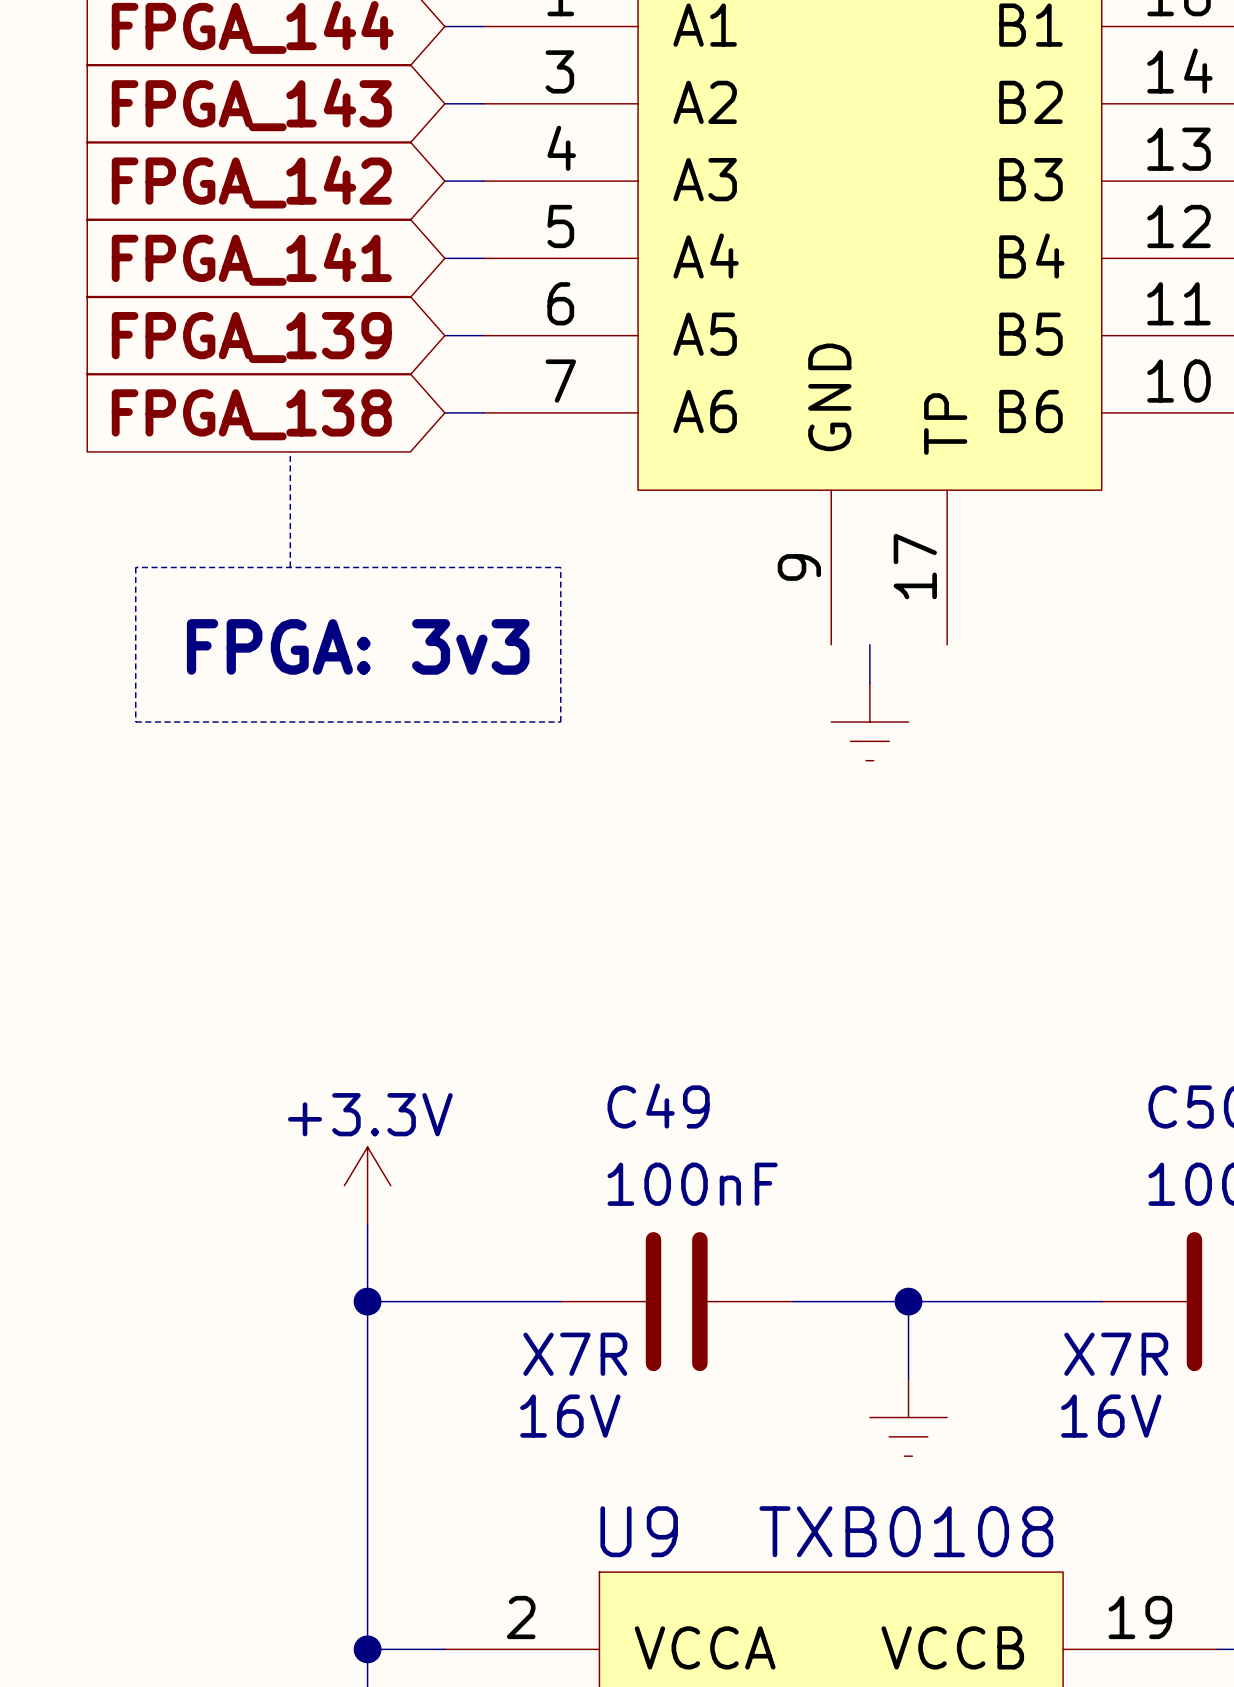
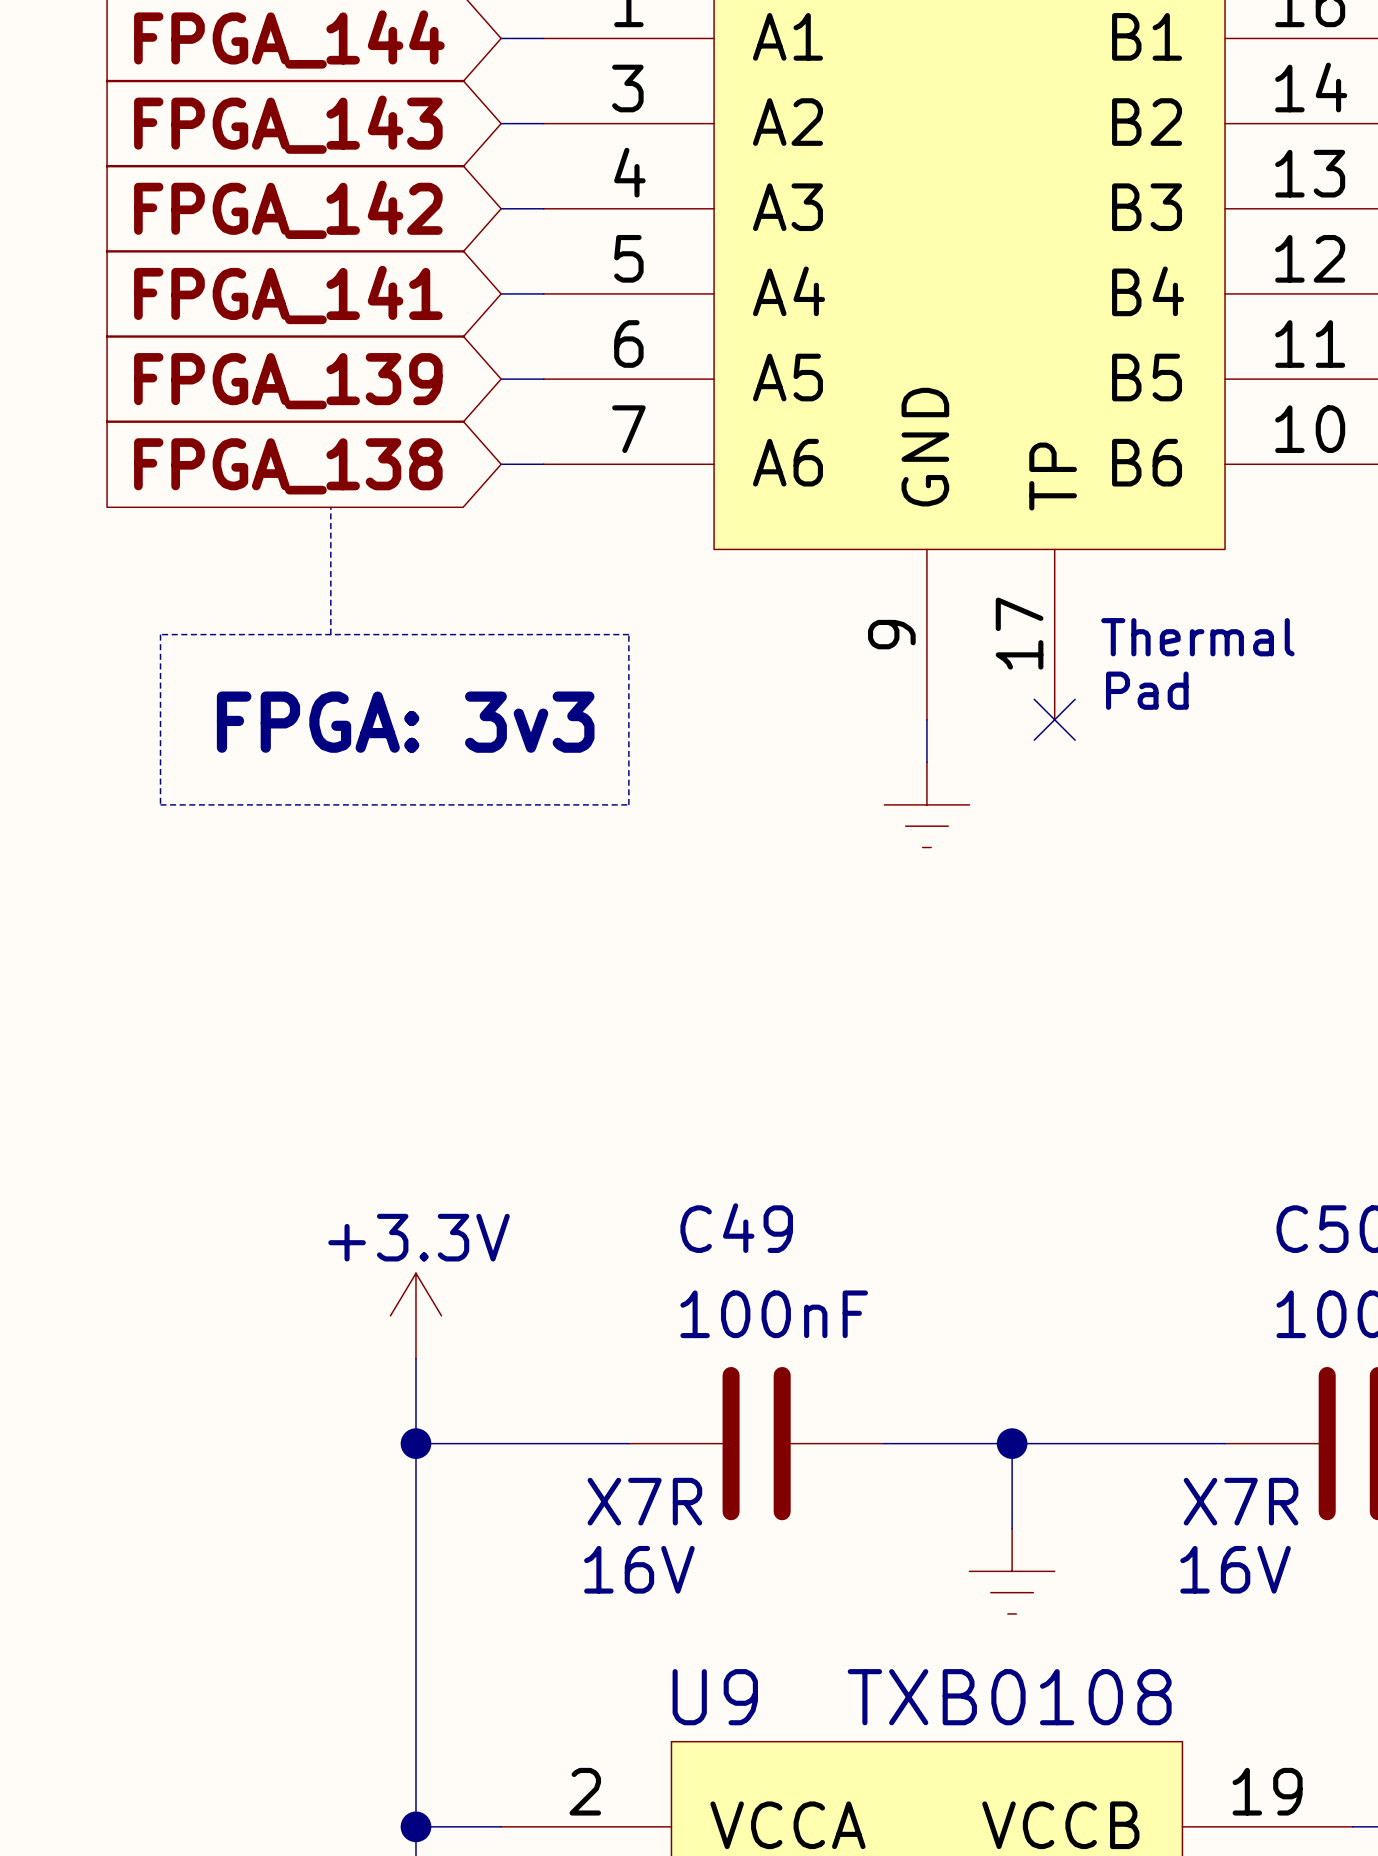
text: none -> Thermal (1197, 637)
text: none -> Pad (1147, 690)
wire: (869, 644) (869, 683) -> (926, 719) (926, 762)
no-connect mark: none -> (1054, 719)
power symbol position: (869, 722) -> (926, 804)

